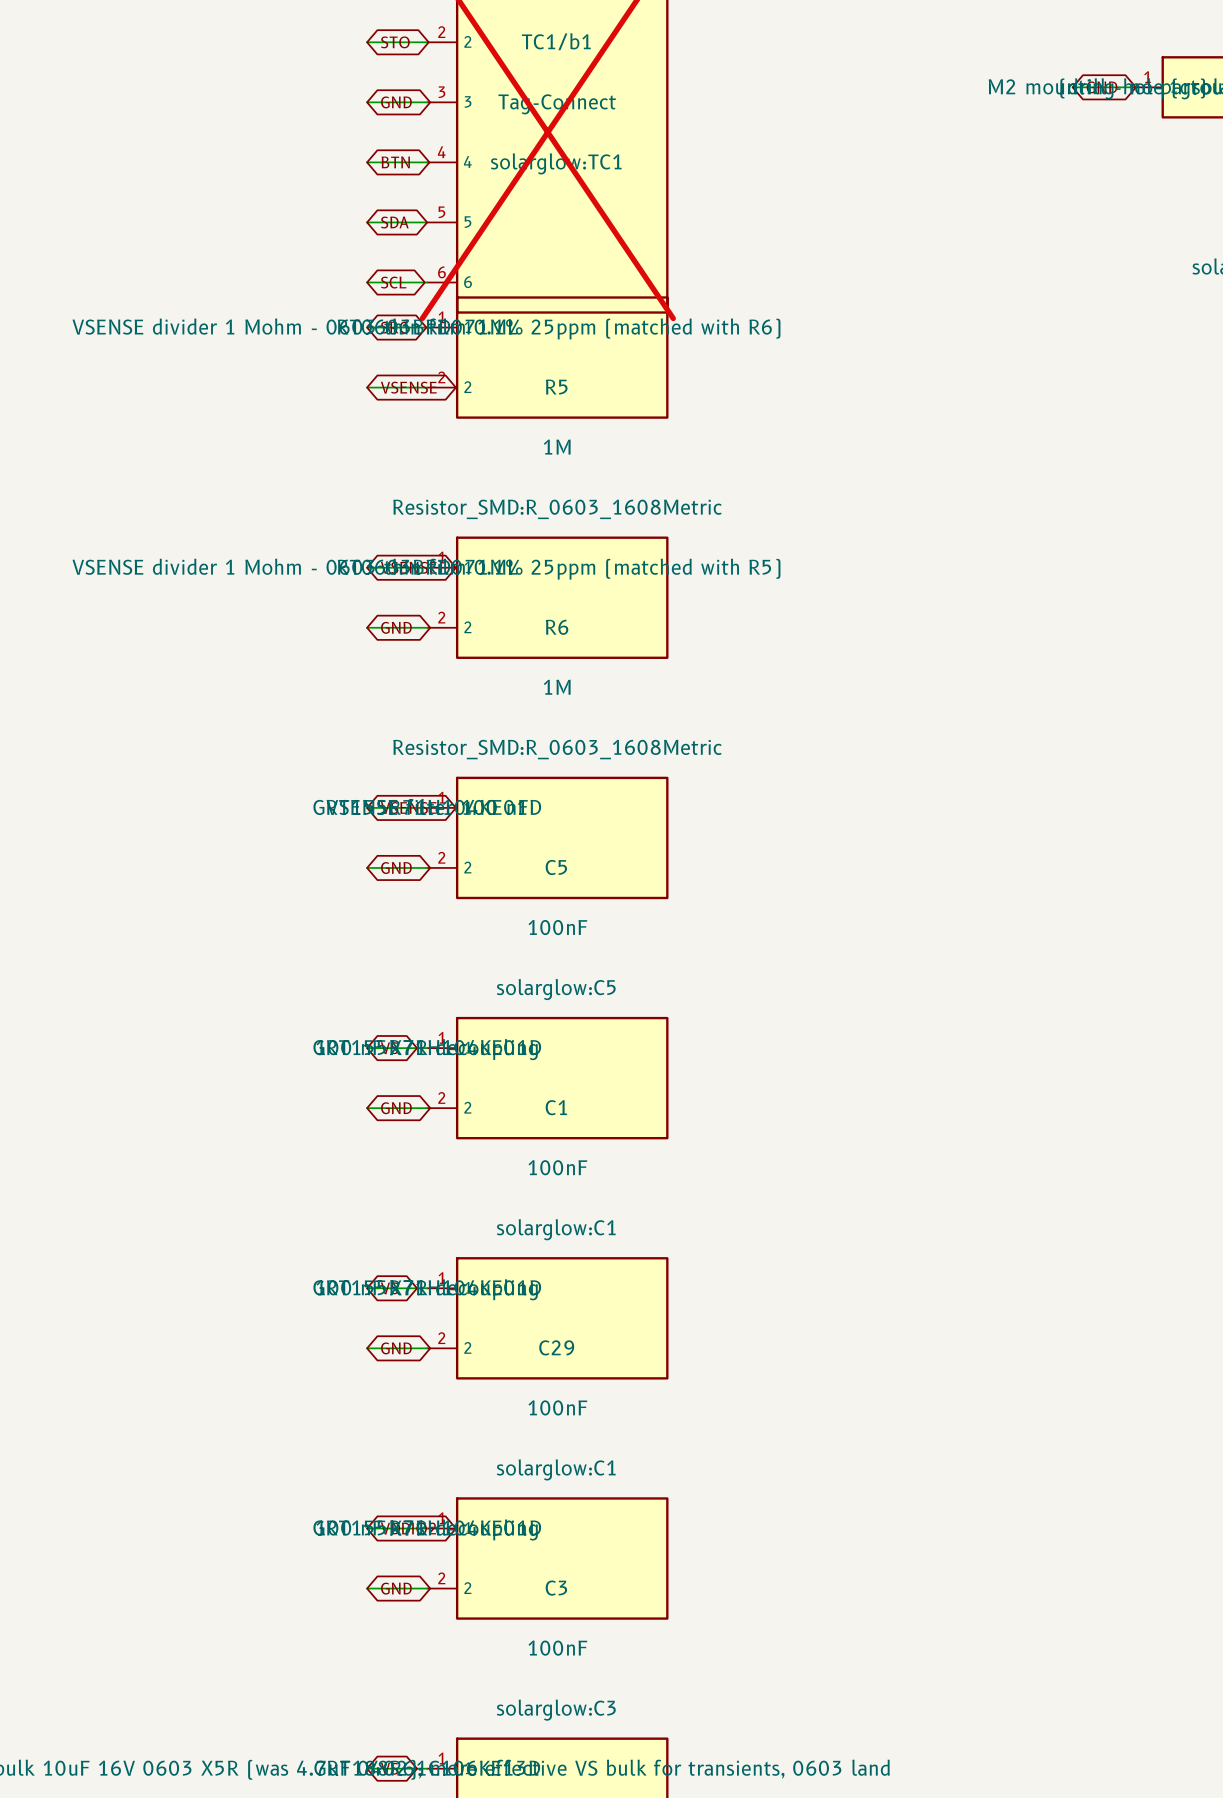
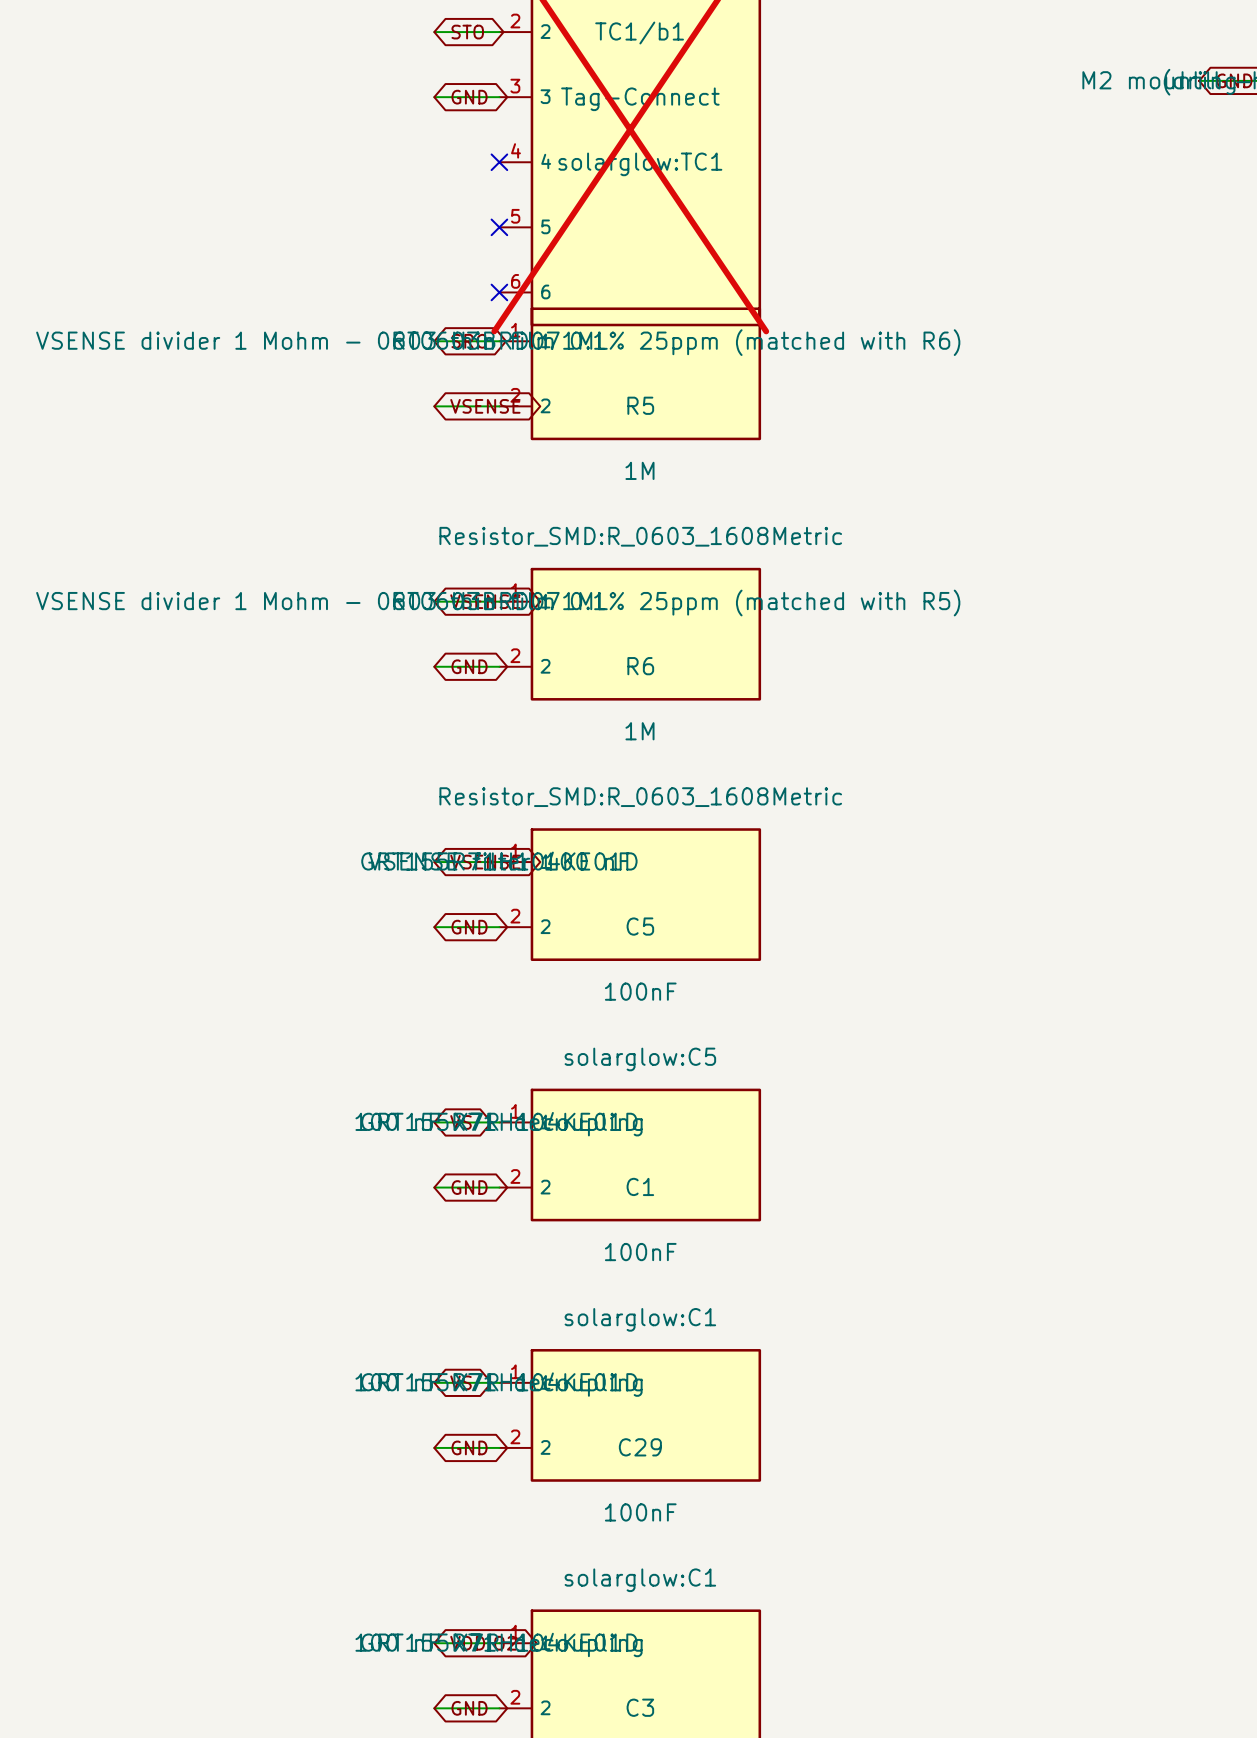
wire: (367, 162) (427, 162) -> none
global label: BTN (395, 162) -> none
no-connect mark: none -> (499, 162)
wire: (367, 222) (427, 222) -> none
global label: SDA (394, 222) -> none
no-connect mark: none -> (499, 227)
wire: (367, 282) (427, 282) -> none
global label: SCL (393, 282) -> none
no-connect mark: none -> (499, 292)

